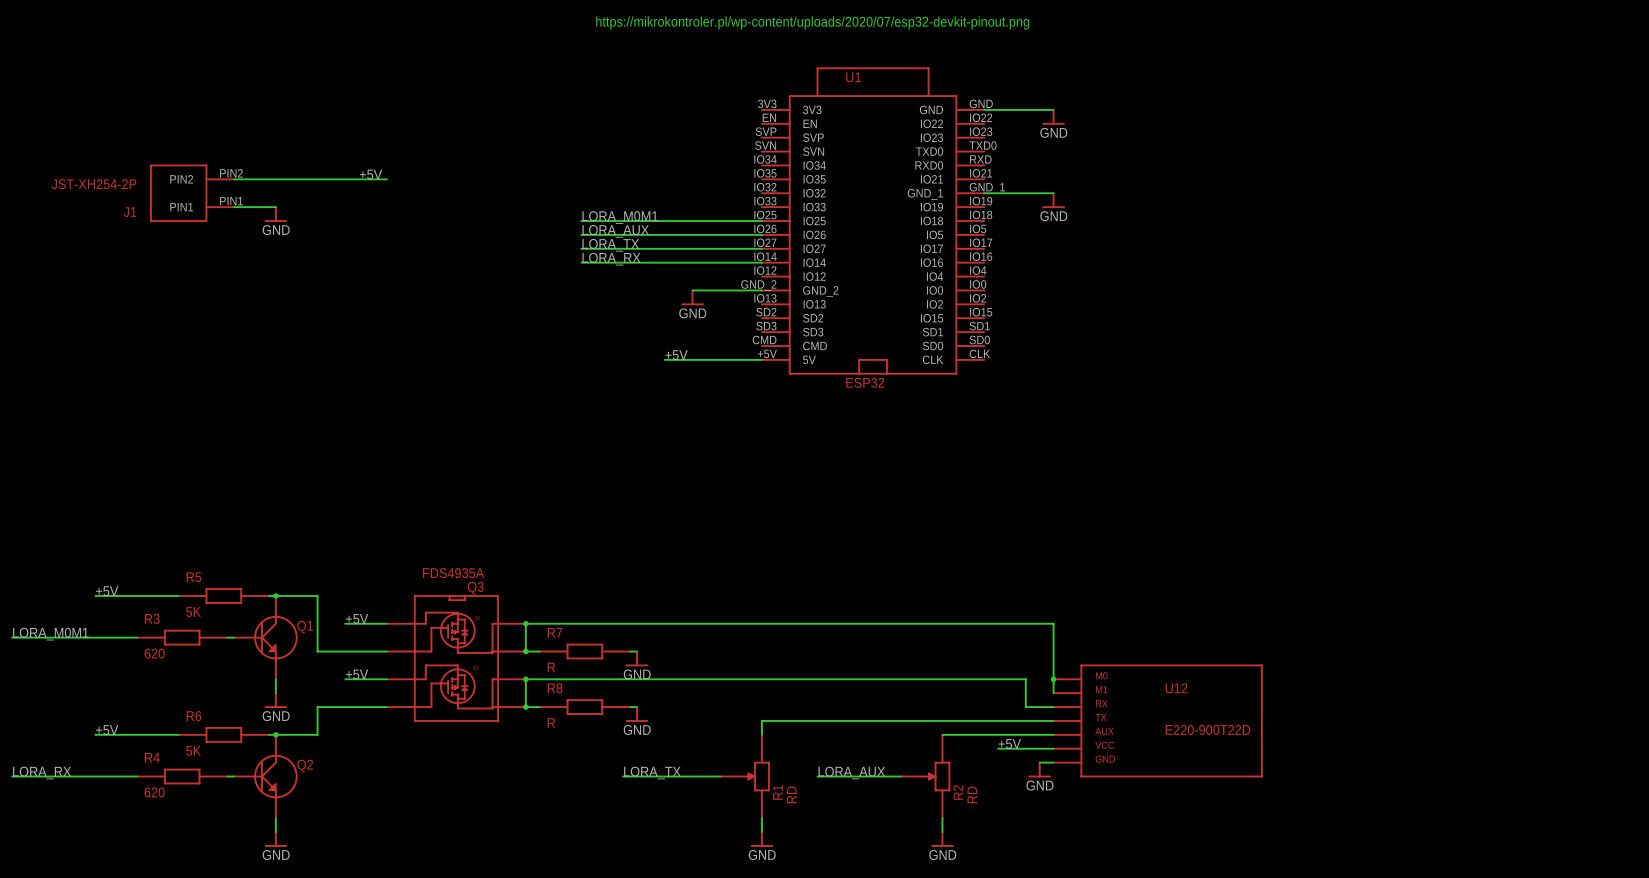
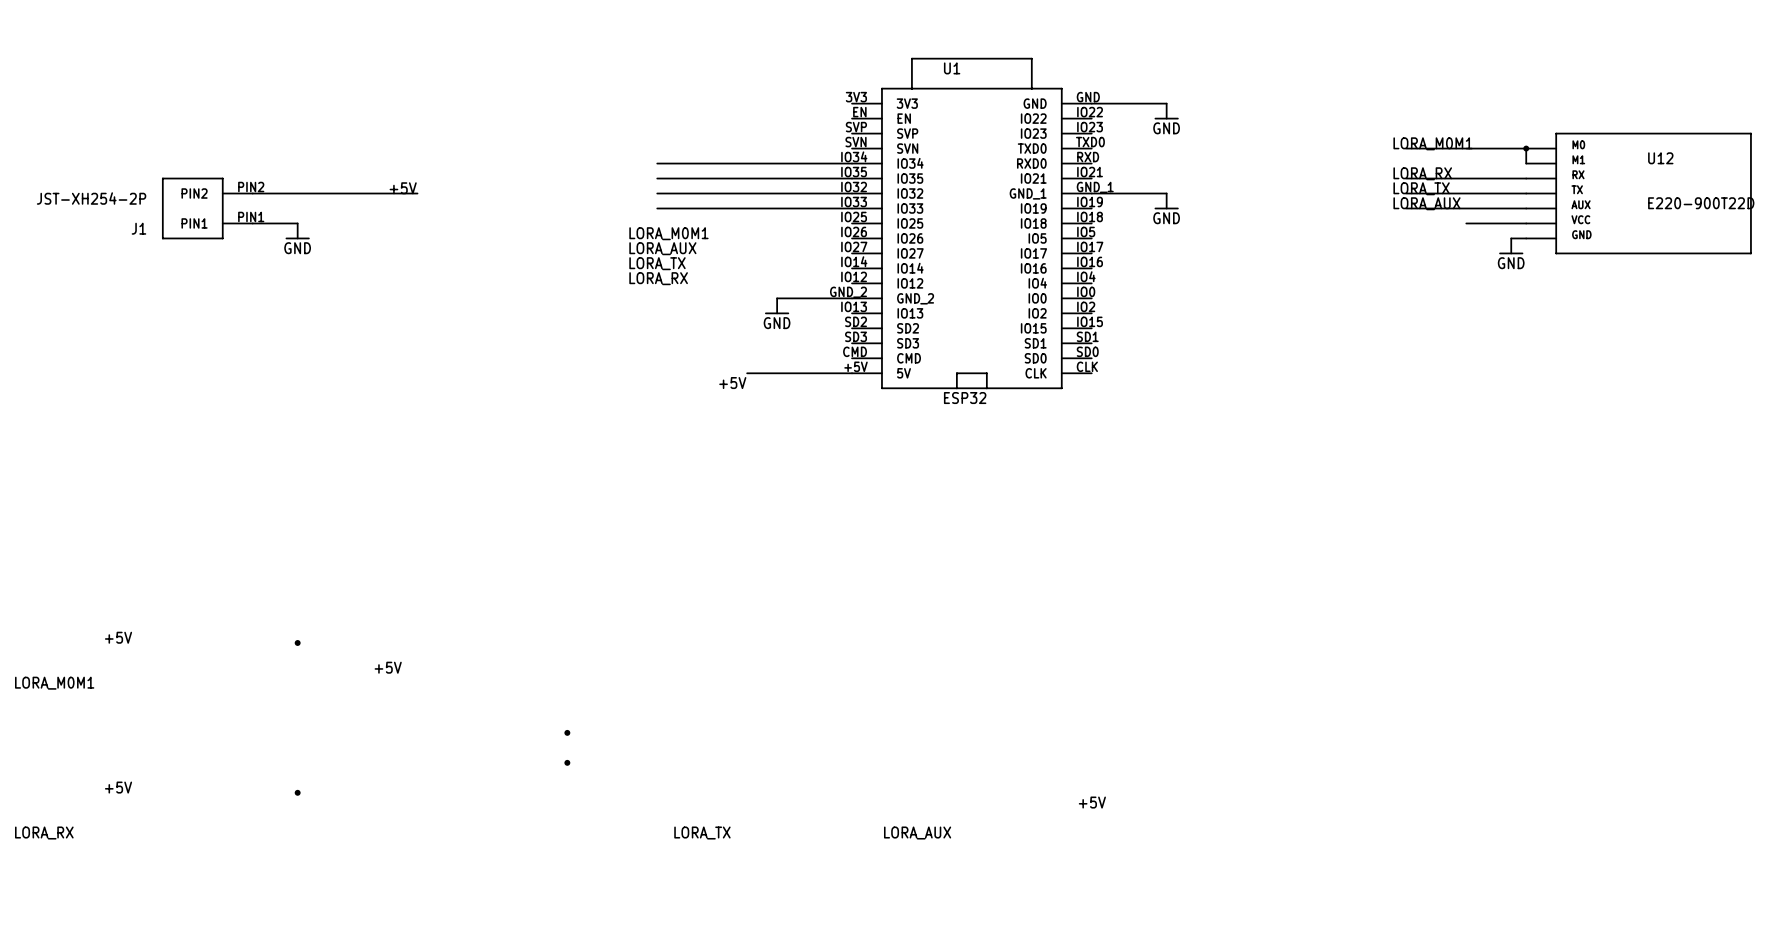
text: https://mikrokontroler.pl/wp-content/uploads/2020/07/esp32-devkit-pinout.png (812, 22) -> none
wire: (984, 109) (1053, 109) -> (1091, 103) (1166, 103)
power symbol position: GND (1053, 117) -> GND (1166, 111)
label: none -> LORA_M0M1 (1433, 143)
wire: none -> (1406, 148) (1526, 148) (1526, 163)
junction: none -> (1526, 148)
label: none -> LORA_RX (1422, 173)
wire: none -> (1406, 178) (1526, 178)
label: none -> LORA_TX (1421, 188)
wire: none -> (1406, 193) (1526, 193)
label: none -> LORA_AUX (1426, 203)
wire: (984, 193) (1053, 193) -> (1091, 193) (1166, 193)
wire: none -> (1406, 208) (1526, 208)
power symbol position: GND (1053, 200) -> GND (1166, 201)
wire: none -> (1466, 223) (1526, 223)
wire: (581, 221) (761, 221) -> (657, 163) (852, 163)
U1 position: (873, 221) -> (971, 223)
wire: none -> (1511, 238) (1526, 238)
power symbol: none -> GND (1511, 246)
wire: (581, 234) (761, 234) -> (657, 178) (852, 178)
wire: (581, 248) (761, 248) -> (657, 193) (852, 193)
wire: (581, 262) (761, 262) -> (657, 208) (852, 208)
wire: (692, 290) (761, 290) -> (777, 298) (852, 298)
power symbol position: GND (692, 297) -> GND (777, 306)
wire: (664, 359) (761, 359) -> (747, 373) (852, 373)
wire: (95, 595) (178, 595) -> none
R5: 5K (223, 595) -> none
wire: (268, 595) (317, 595) (317, 651) (387, 651) -> none
wire: (345, 623) (387, 623) -> none
junction: (525, 623) -> none
wire: (12, 637) (137, 637) -> none
R3: 620 (182, 637) -> none
wire: (227, 637) (234, 637) -> none
Q1: (265, 637) -> none
junction: (525, 651) -> none
wire: (539, 651) (525, 651) (525, 623) (1053, 623) (1053, 693) -> none
R7: R (584, 651) -> none
wire: (630, 651) (636, 651) -> none
Q3: FDS4935A (456, 658) -> none
power symbol: GND (636, 658) -> none
label: +5V (357, 674) -> none
wire: (275, 679) (275, 693) -> none
wire: (345, 679) (387, 679) -> none
junction: (1053, 679) -> none
power symbol: GND (275, 700) -> none
wire: (387, 707) (317, 707) (317, 734) (268, 734) -> none
wire: (539, 707) (525, 707) (525, 679) (1025, 679) (1025, 707) (1053, 707) -> none
R8: R (584, 707) -> none
wire: (630, 707) (636, 707) -> none
power symbol: GND (636, 714) -> none
wire: (1053, 720) (761, 720) (761, 734) -> none
U12 position: (1158, 720) -> (1638, 193)
wire: (95, 734) (178, 734) -> none
R6: 5K (223, 734) -> none
wire: (942, 734) (1053, 734) -> none
wire: (998, 748) (1053, 748) -> none
wire: (1039, 762) (1053, 762) -> none
power symbol: GND (1039, 769) -> none
wire: (12, 776) (137, 776) -> none
R4: 620 (182, 776) -> none
wire: (227, 776) (234, 776) -> none
Q2: (265, 776) -> none
wire: (623, 776) (720, 776) -> none
R1: RD (744, 776) -> none
wire: (817, 776) (900, 776) -> none
R2: RD (925, 776) -> none
wire: (275, 818) (275, 832) -> none
wire: (761, 818) (761, 832) -> none
wire: (942, 818) (942, 832) -> none
power symbol: GND (275, 839) -> none
power symbol: GND (761, 839) -> none
power symbol: GND (942, 839) -> none

